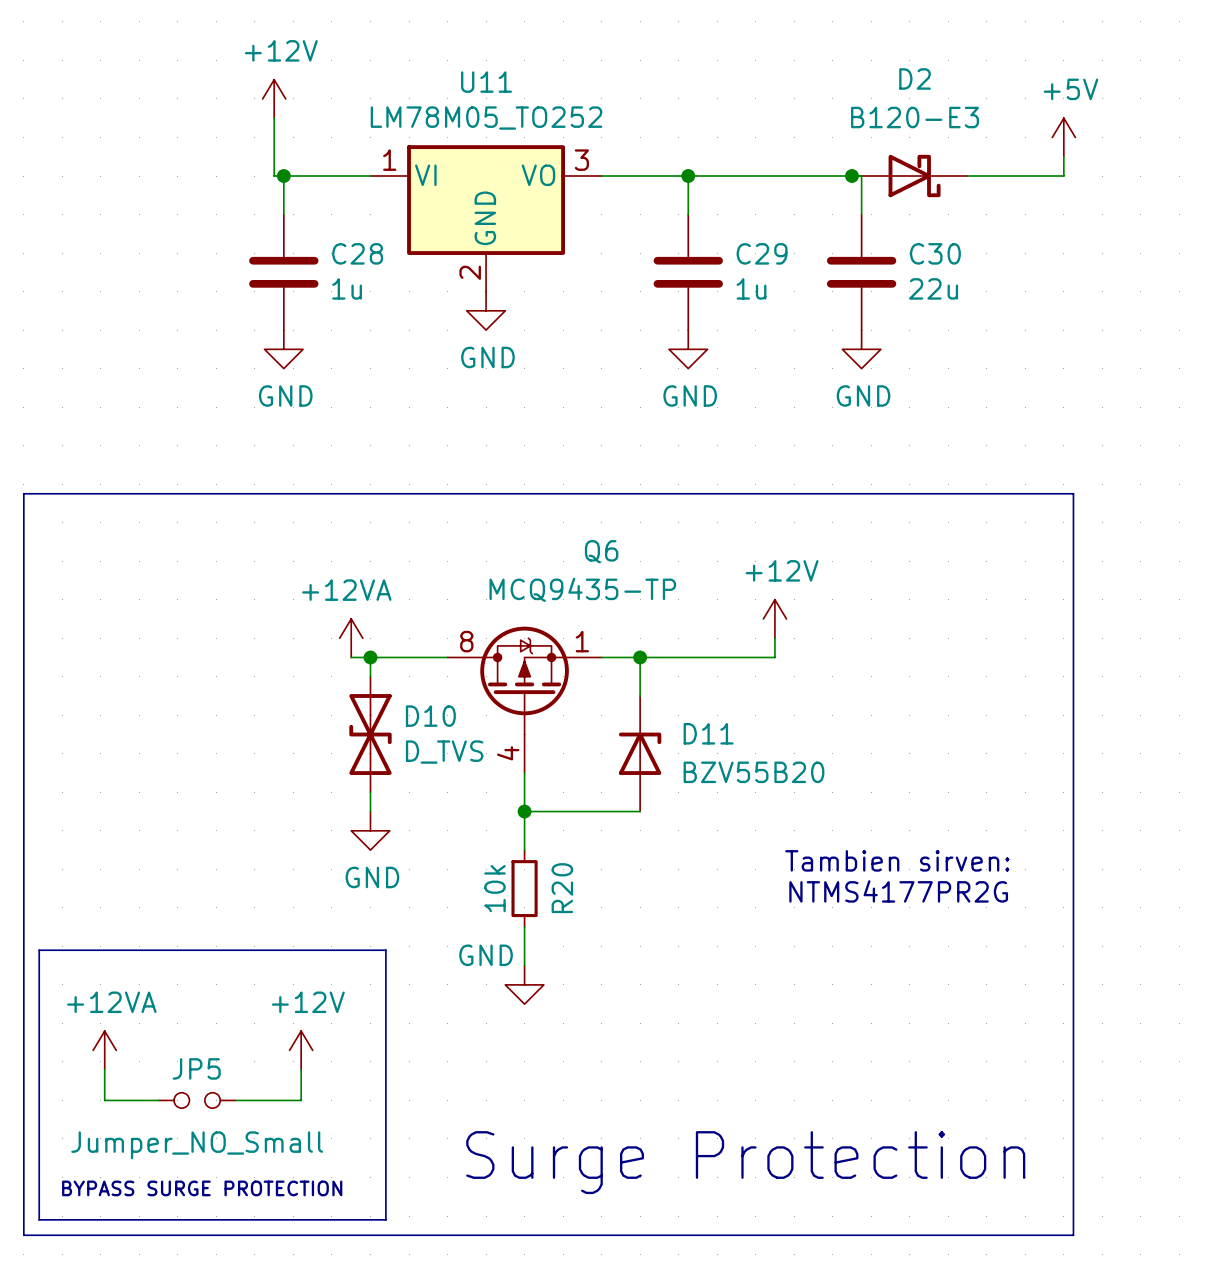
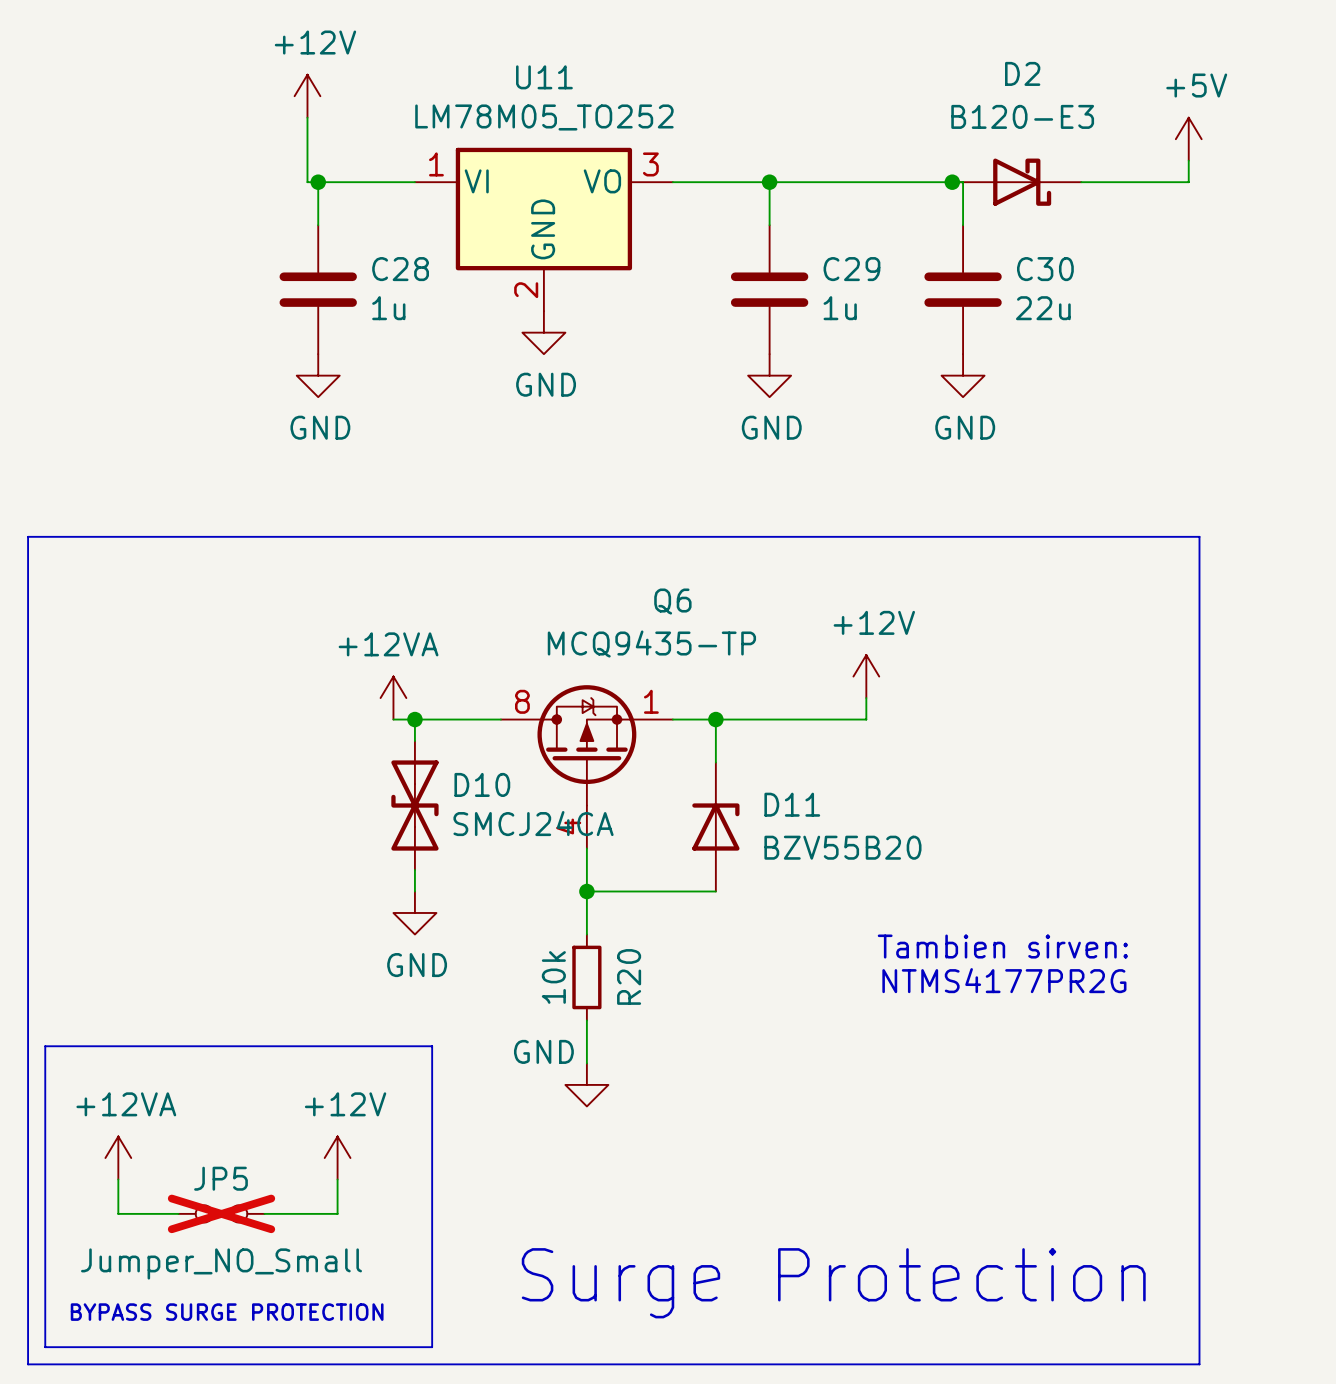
D10 value: D_TVS (444, 752) -> SMCJ24CA (533, 823)
JP5 do-not-place cross: none -> (221, 1213)

